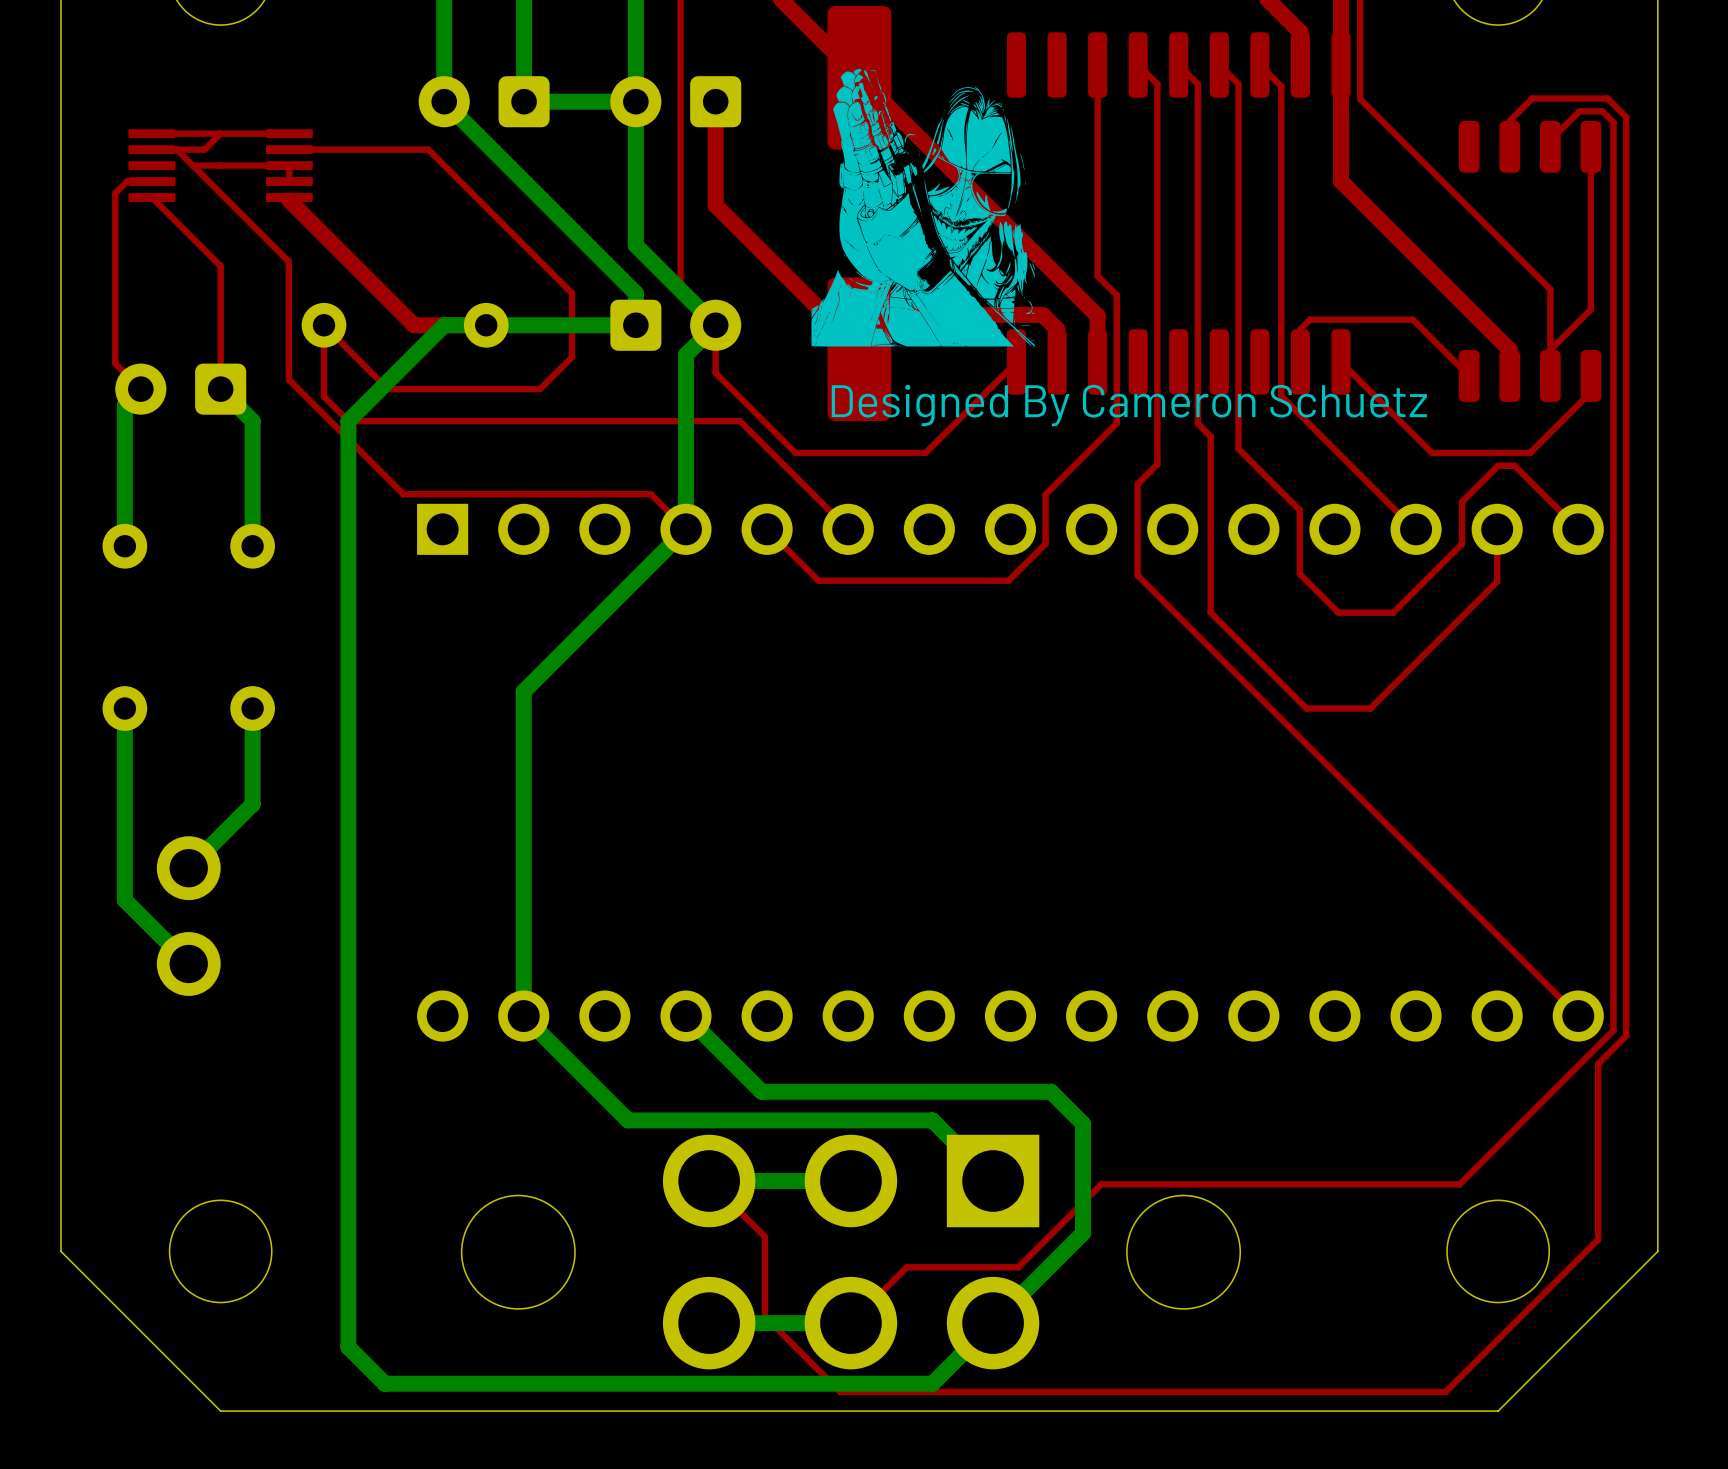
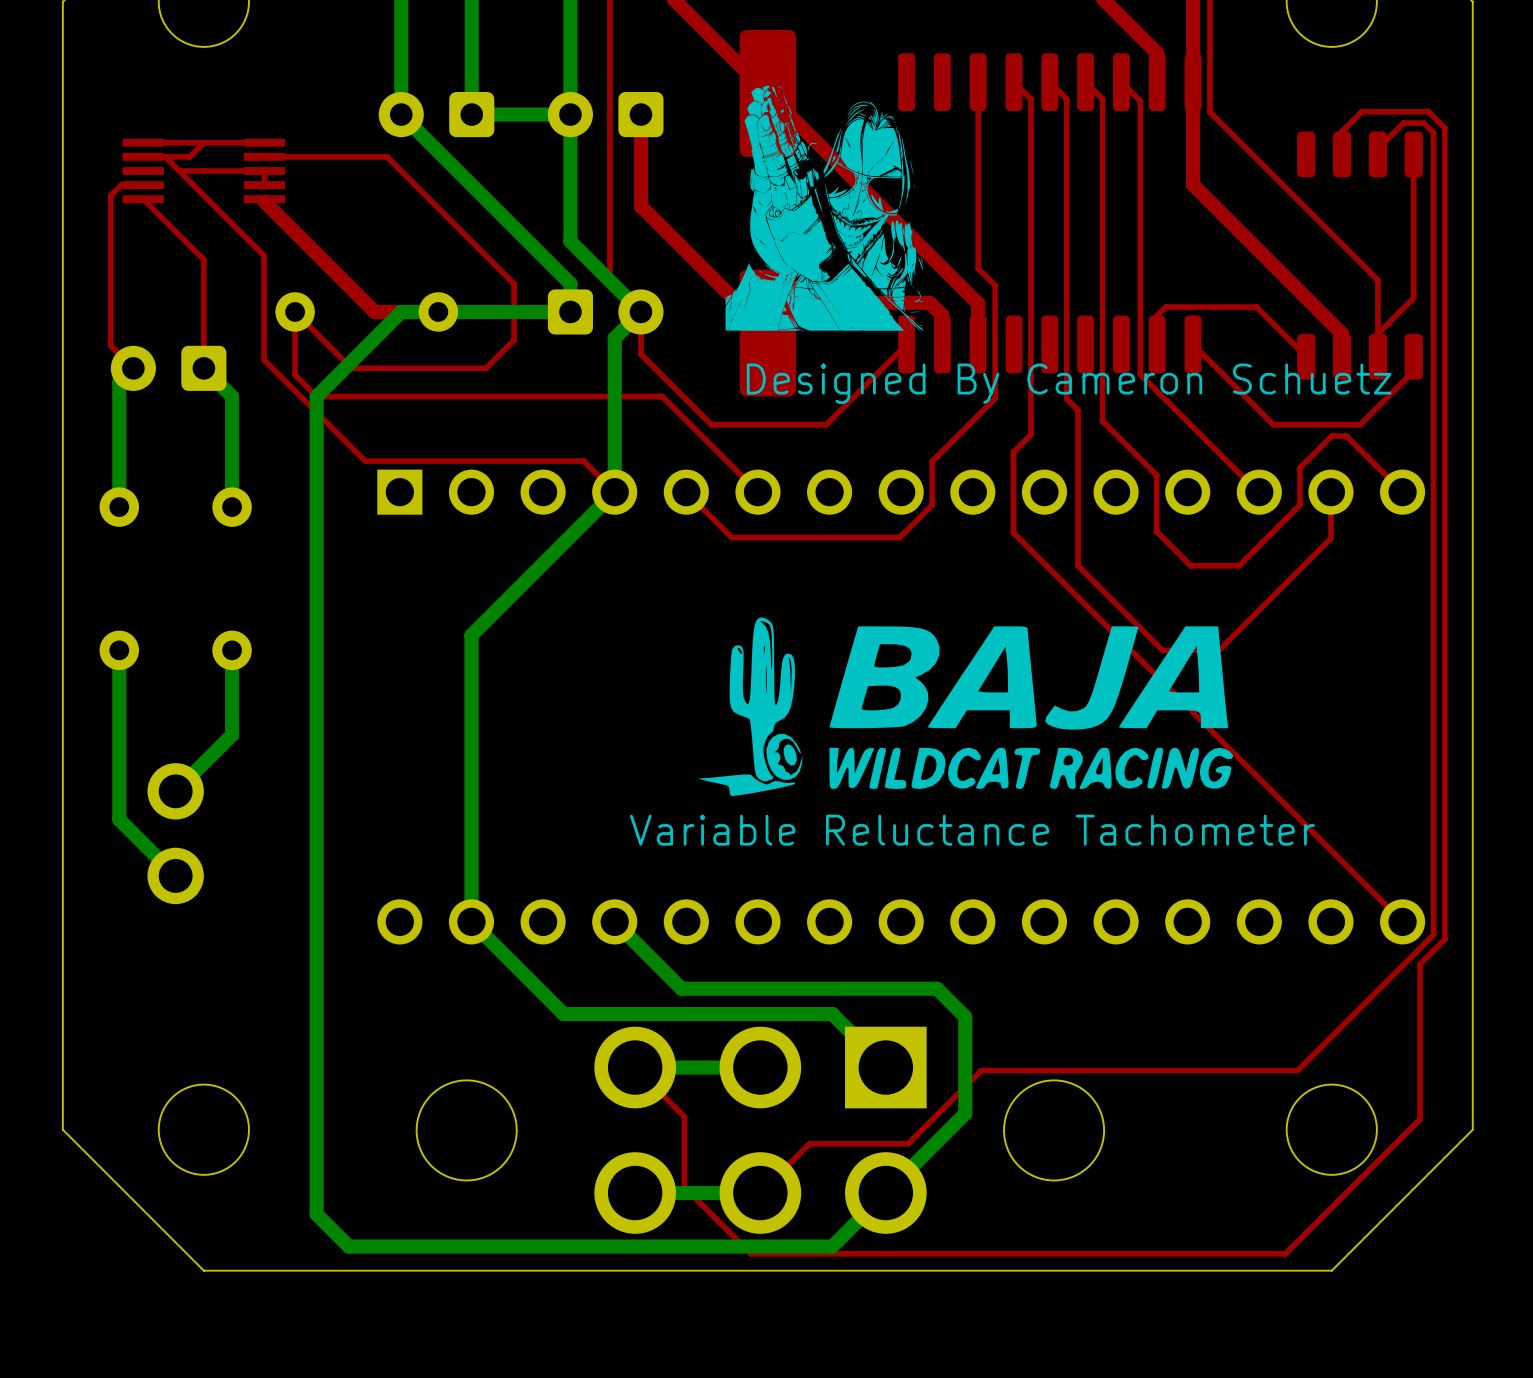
drawing: none -> [698, 617, 1234, 797]
text: none -> Variable Reluctance Tachometer (972, 830)

